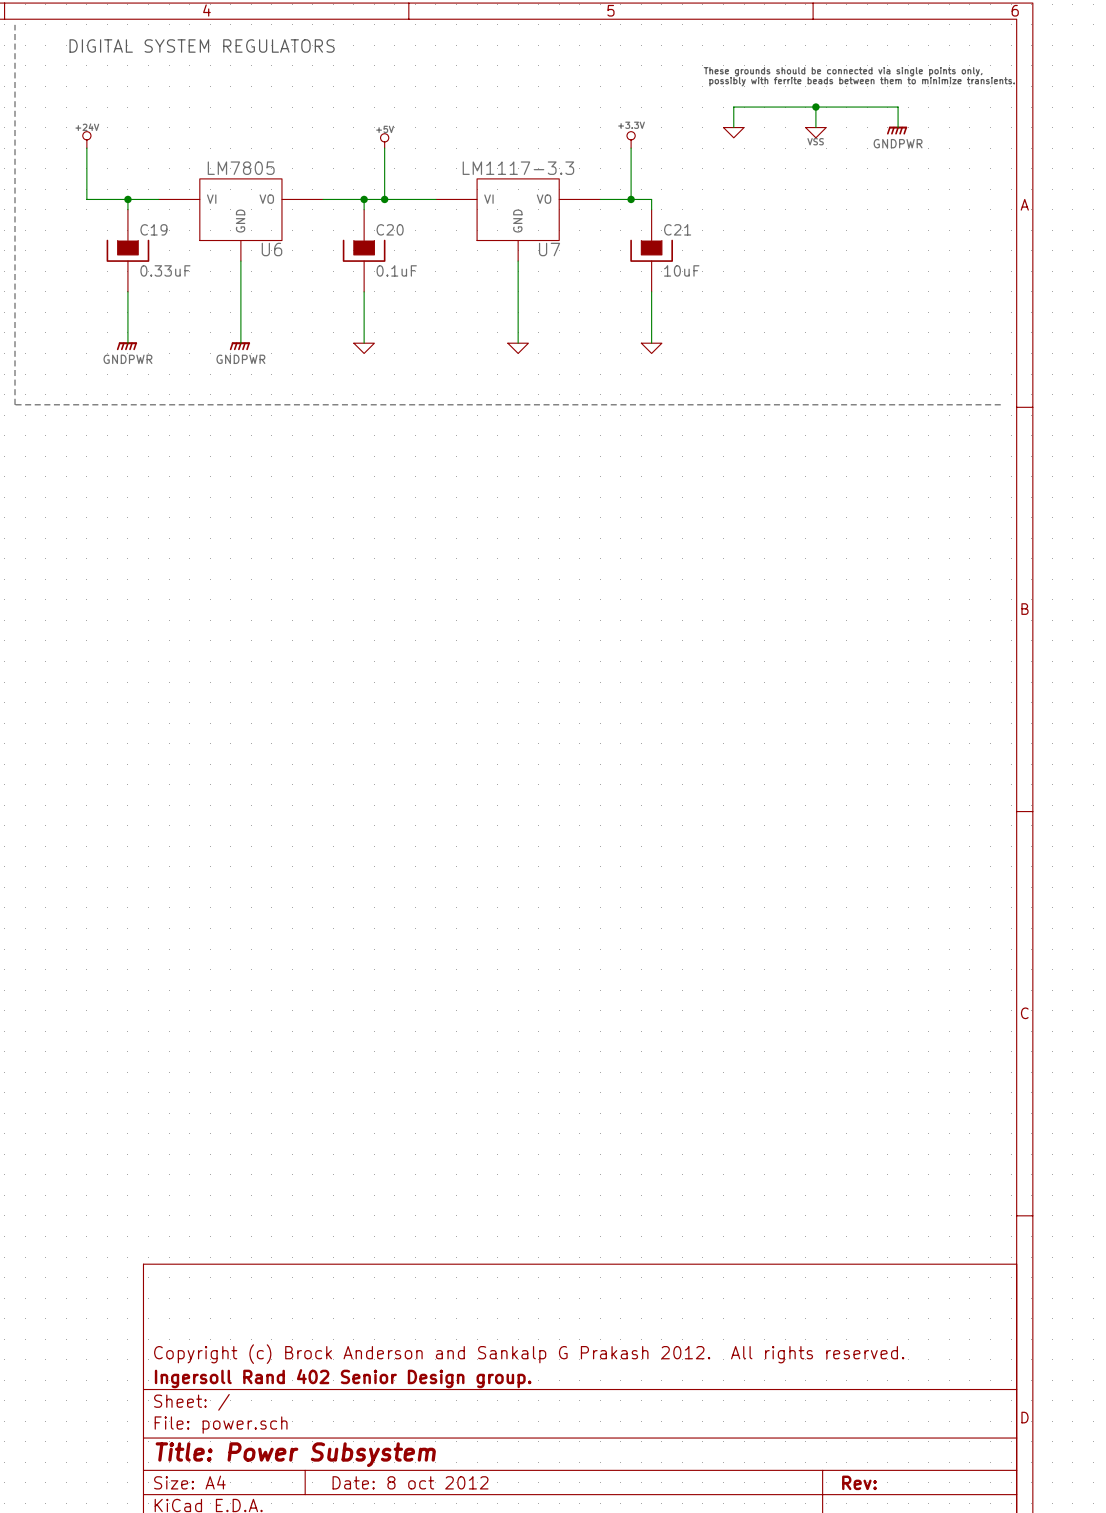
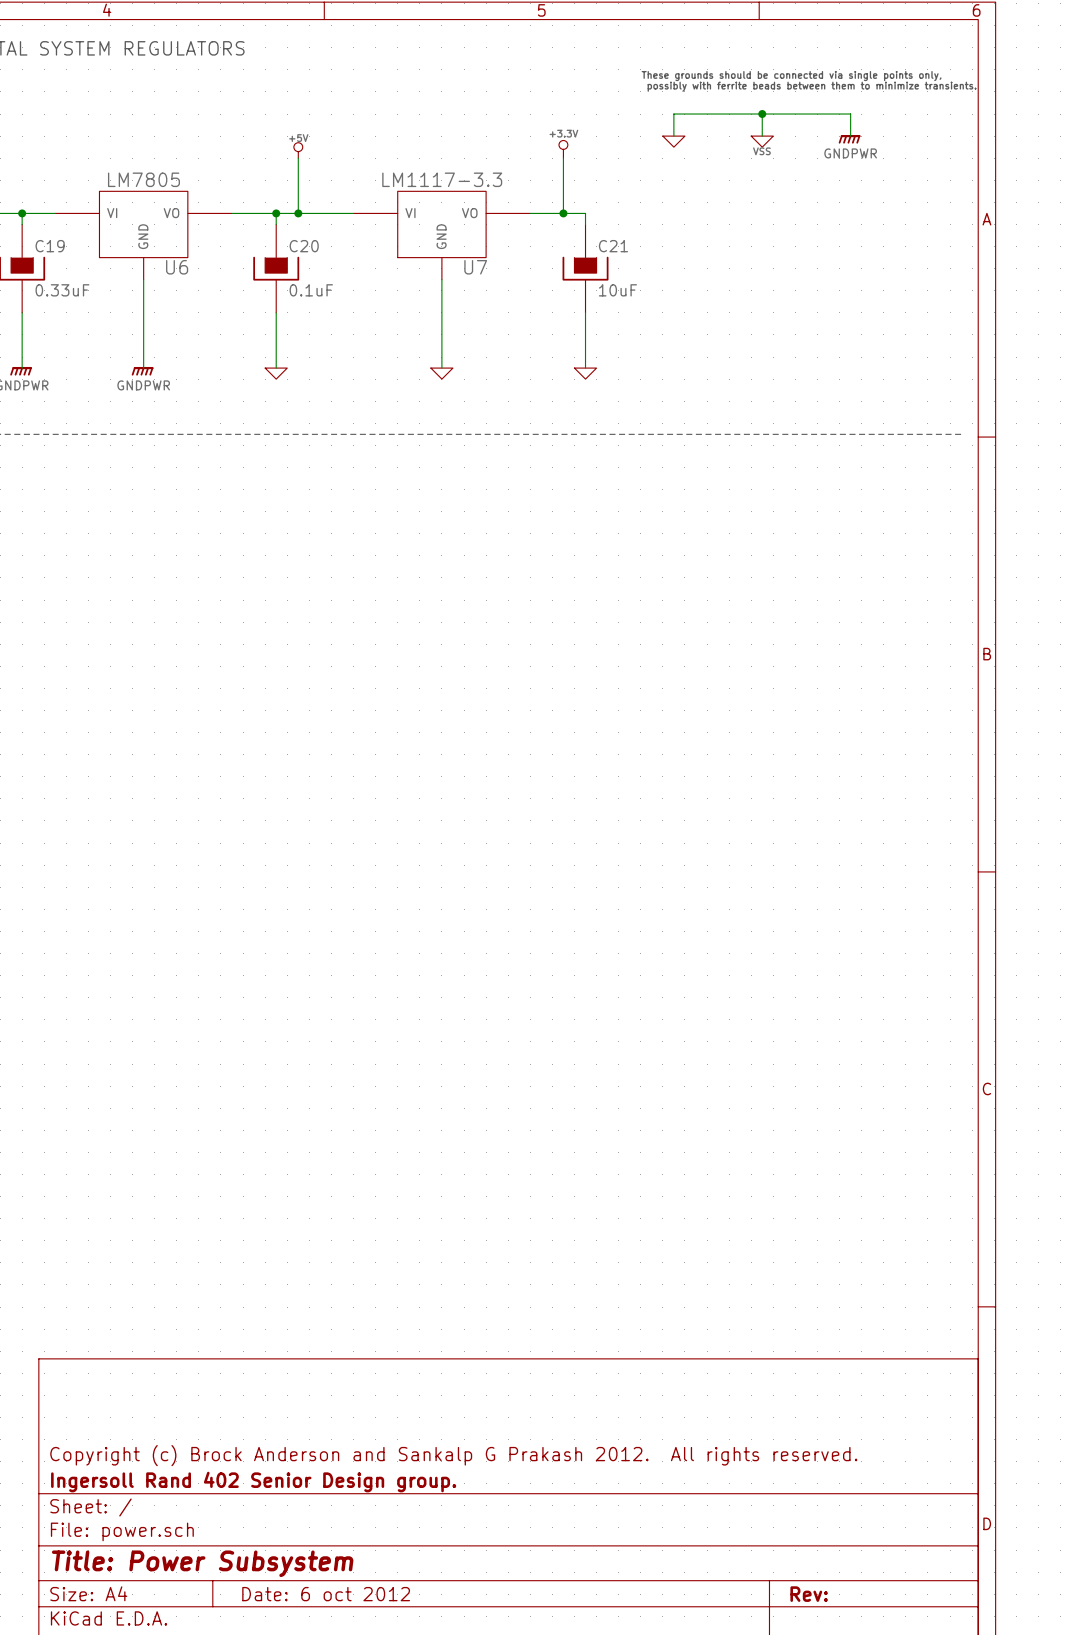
title block: Date: 8 oct 2012 (410, 1482) -> Date: 6 oct 2012 (326, 1594)

